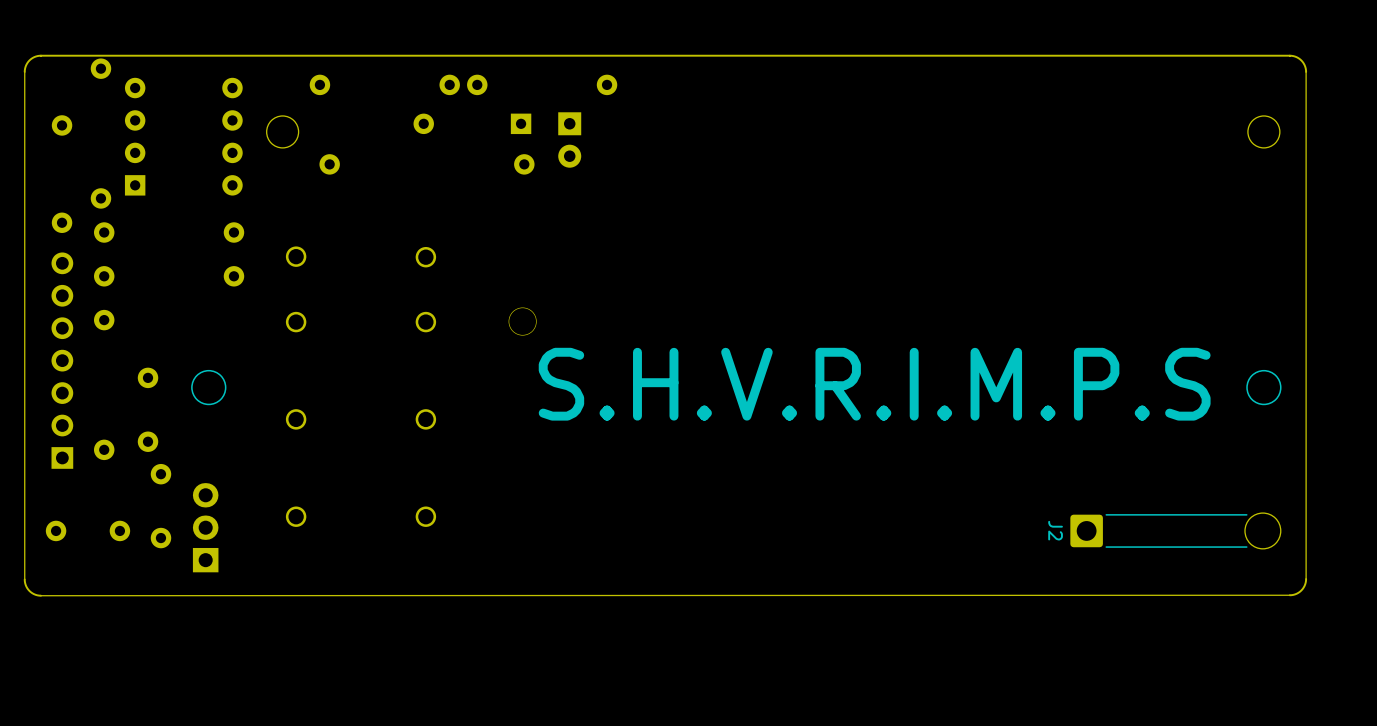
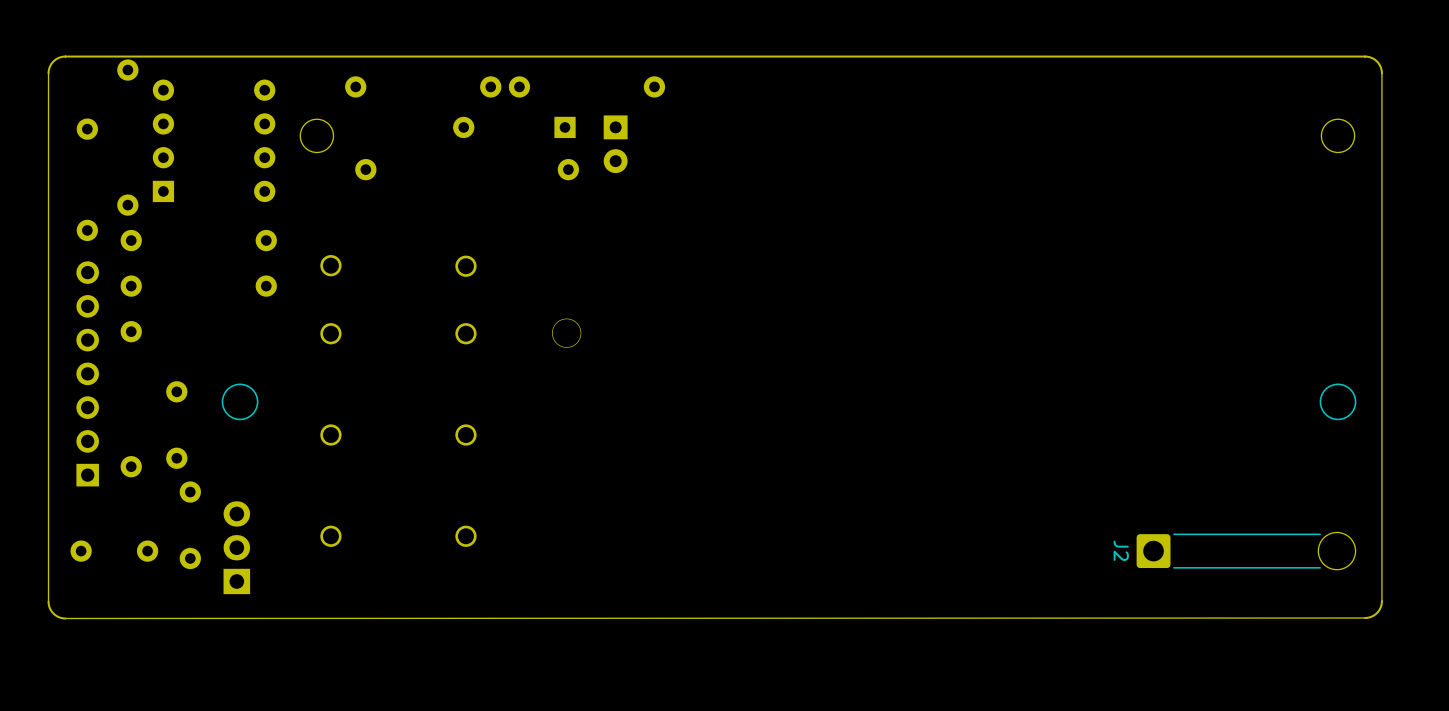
text: S.H.V.R.I.M.P.S (874, 384) -> none

